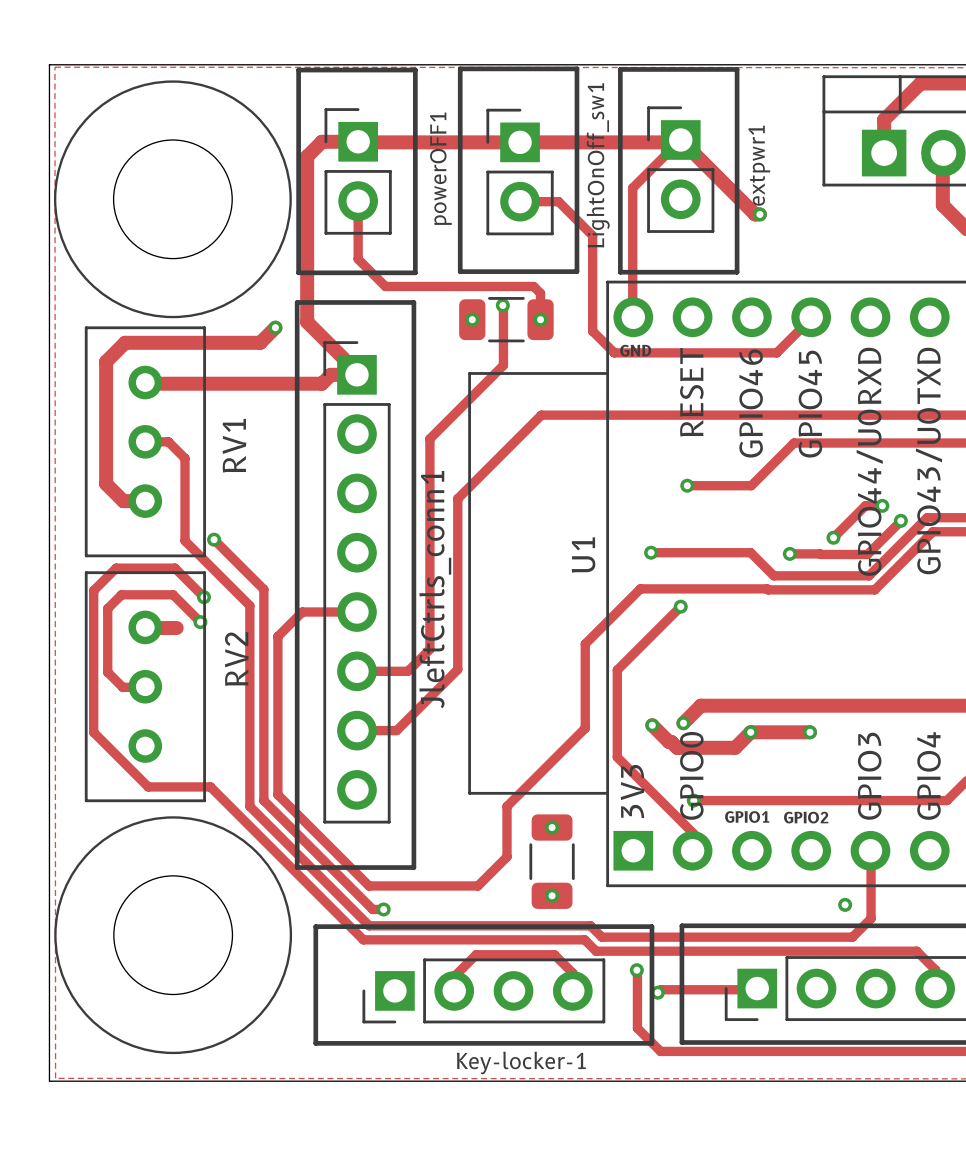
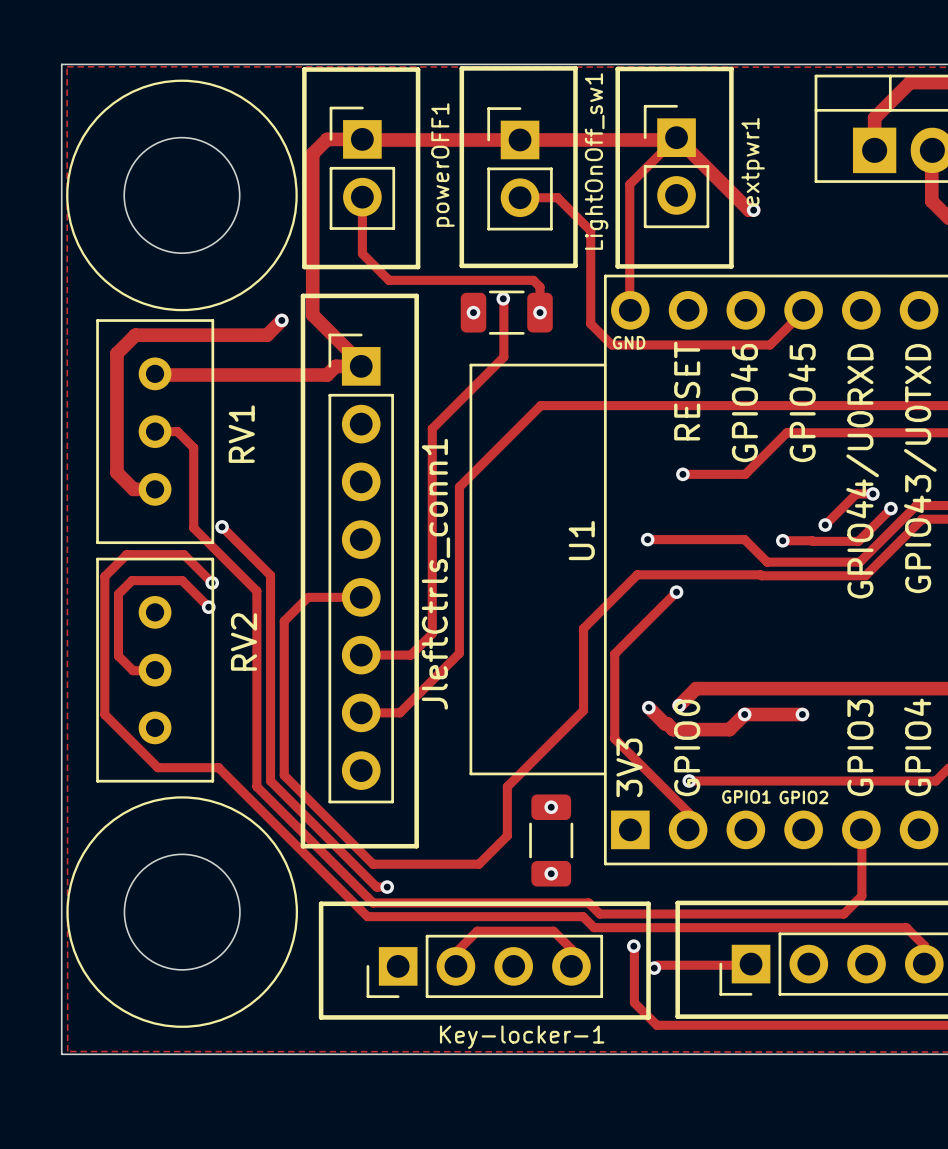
track: (145, 628) (176, 628) -> none
via: (845, 904) -> none

